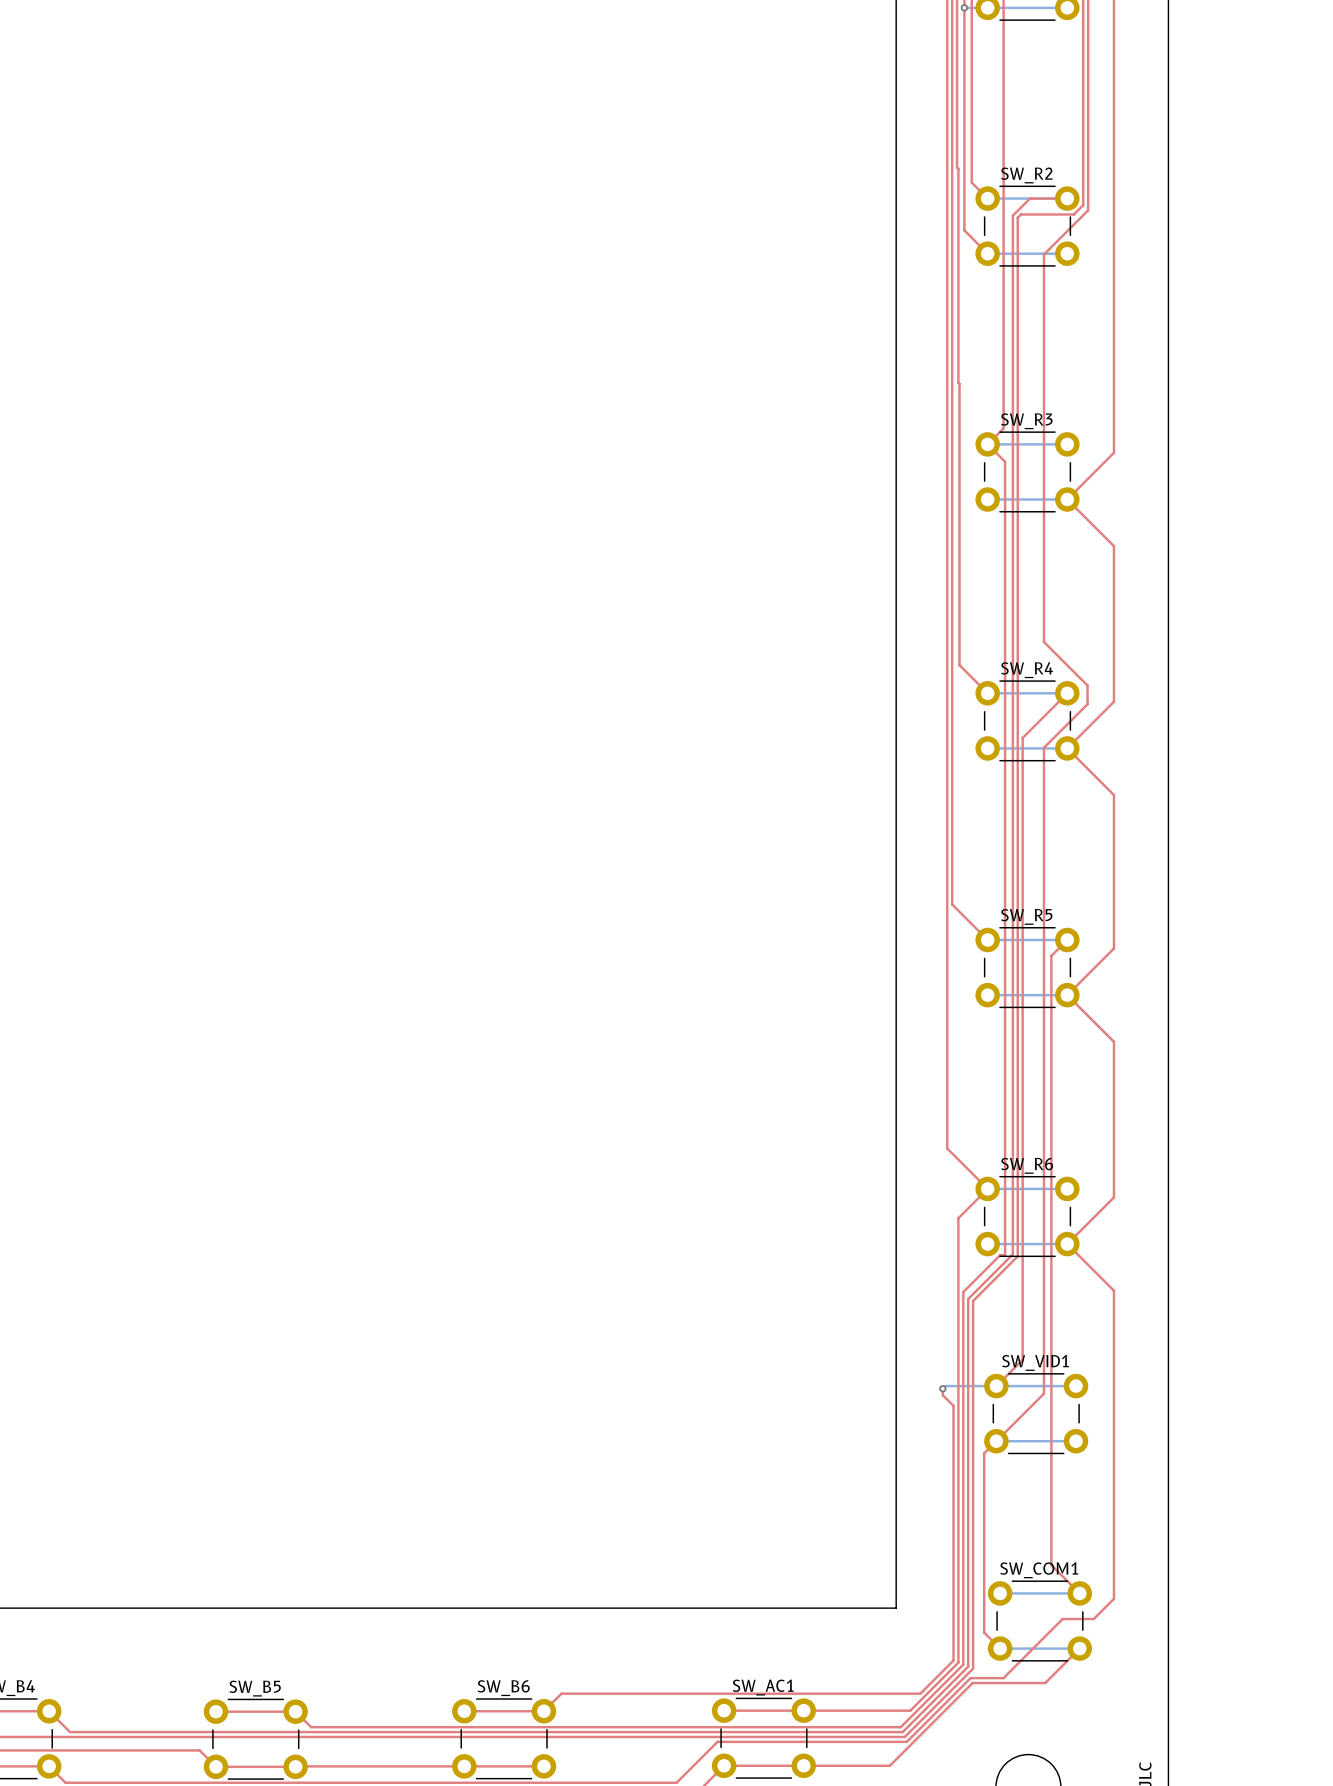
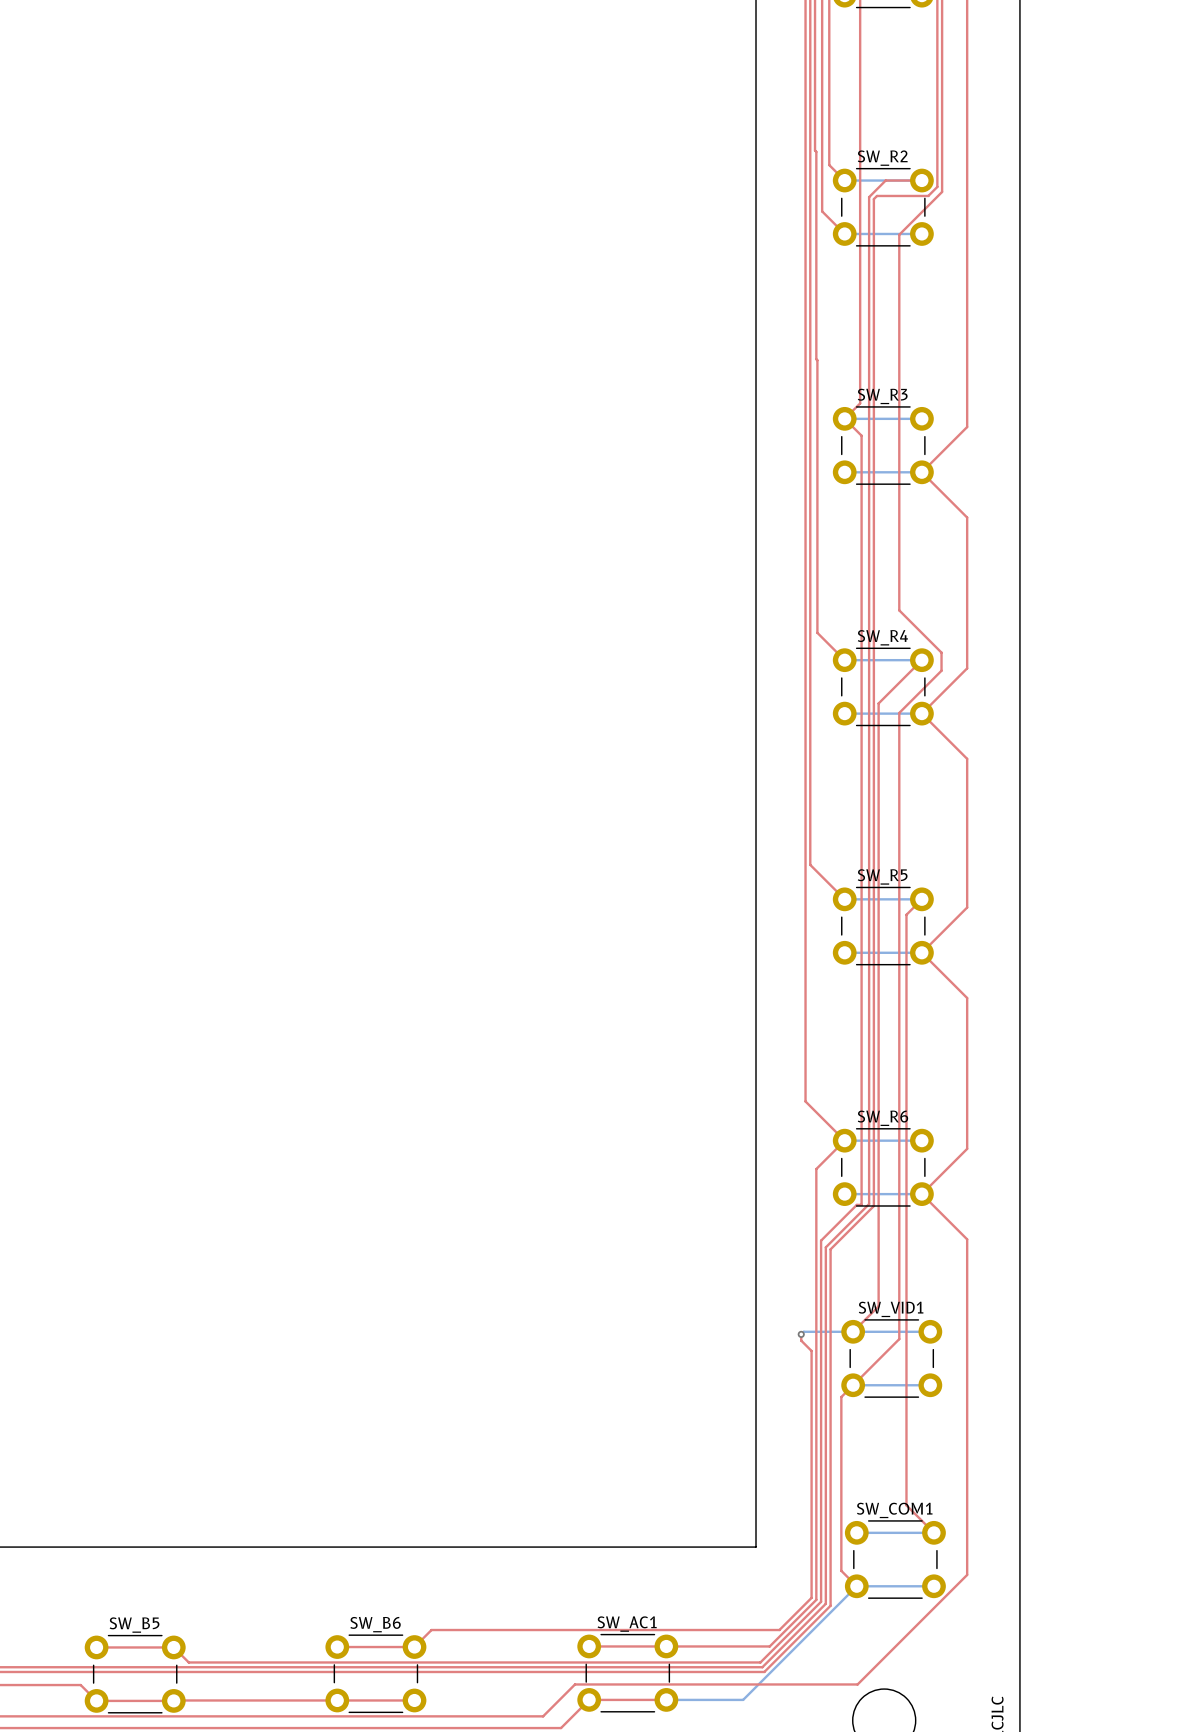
top track: (1113, 1598) (1093, 1619) (1062, 1619) (1003, 1678) (970, 1678) (906, 1741) (717, 1741) (709, 1749) -> (967, 1538) (967, 1574) (857, 1684) (575, 1684)
bottom track: none -> (856, 1586) (743, 1699) (666, 1699)
top track: (1079, 1648) (1045, 1683) (972, 1683) (889, 1765) (803, 1765) -> none

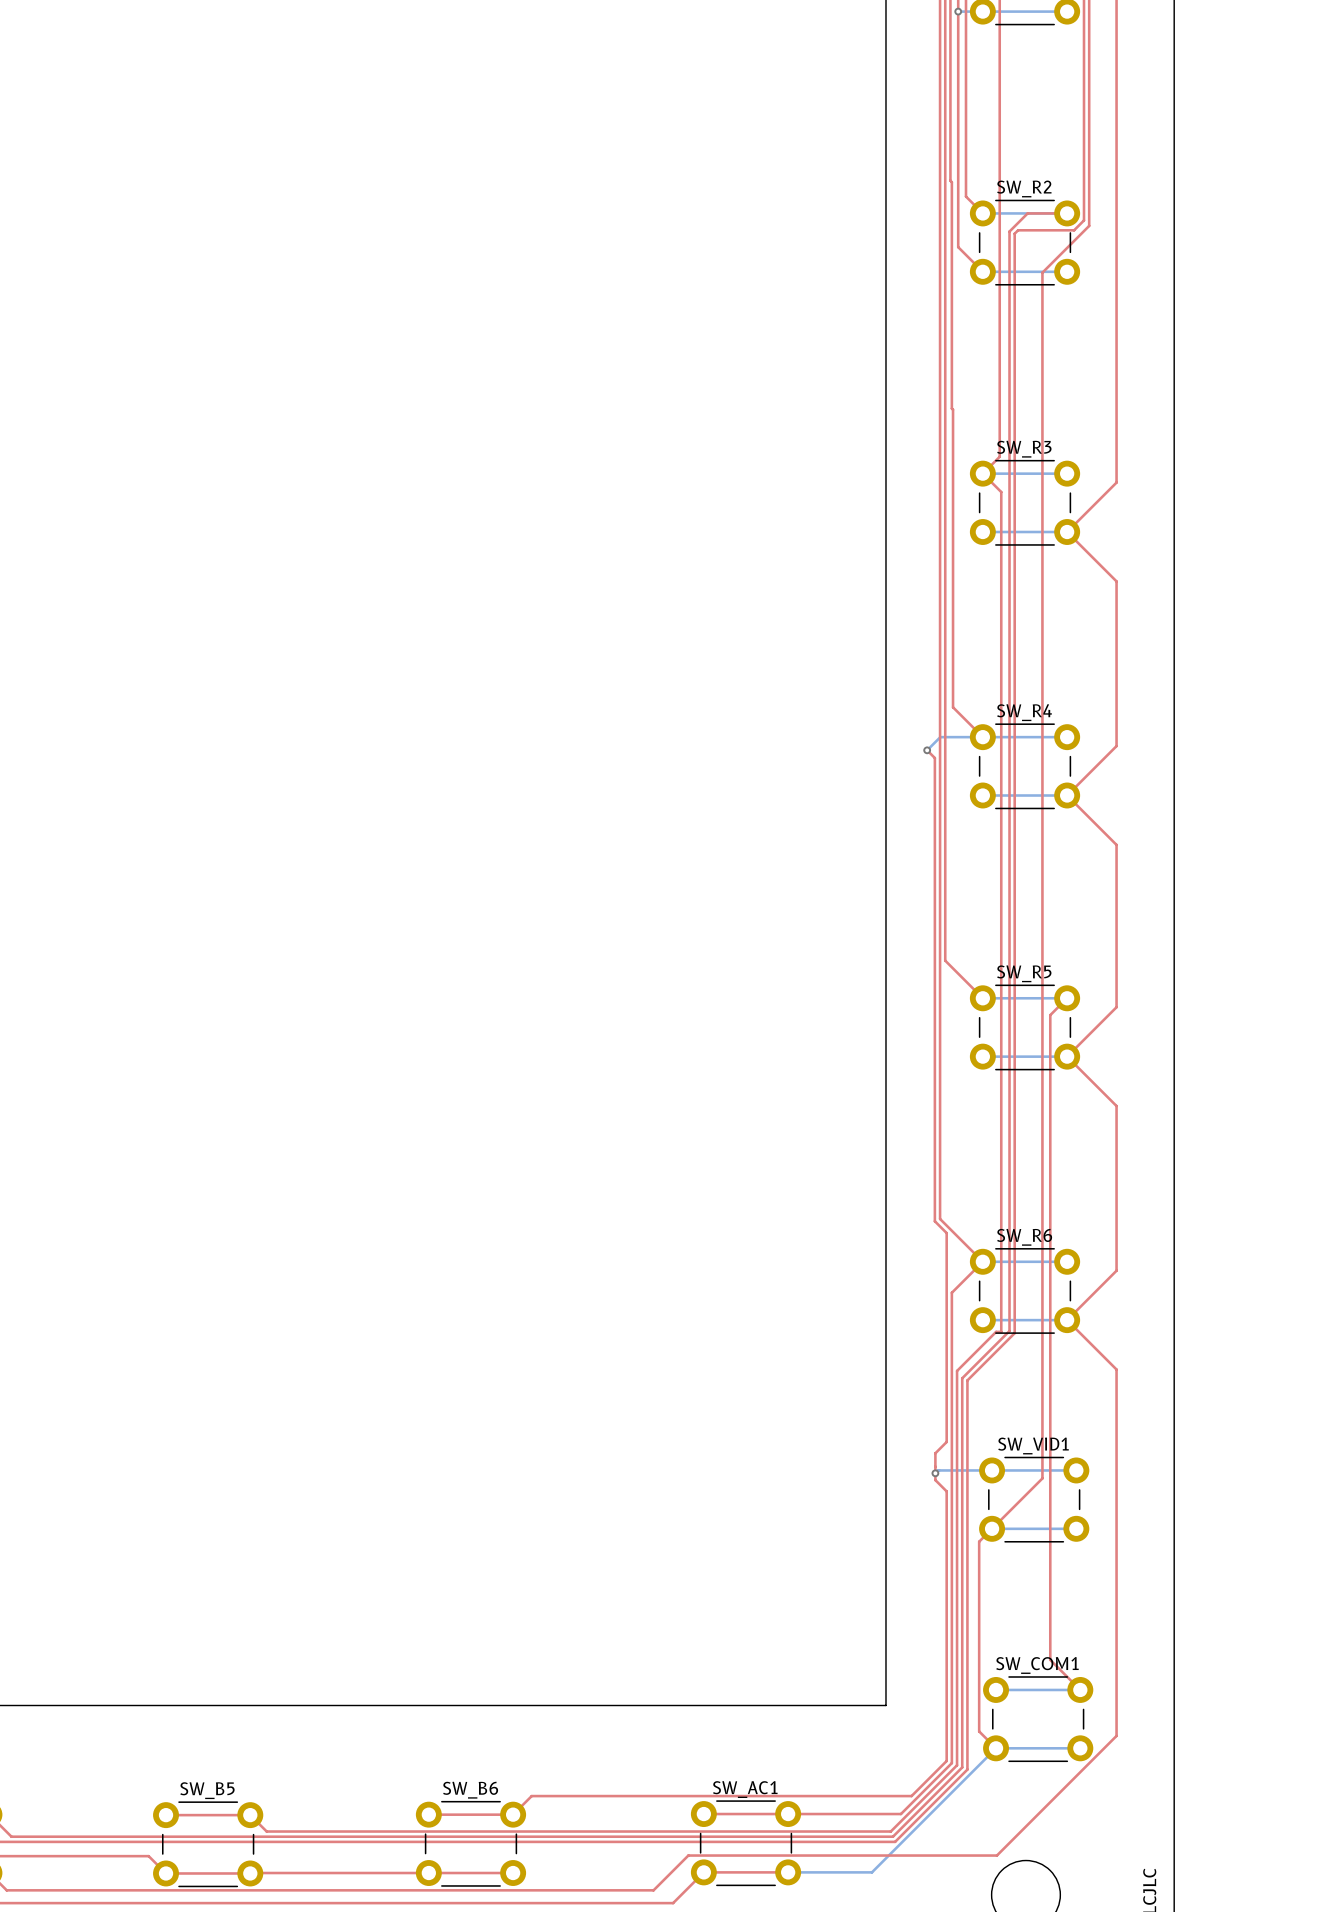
top track: (899, 610) (941, 652) (941, 670) (899, 712) -> (1042, 682) (1042, 794)
bottom track: none -> (982, 737) (940, 737) (927, 750)
top track: (921, 660) (878, 703) (878, 1306) (853, 1331) -> none
top track: none -> (927, 750) (934, 758) (934, 1221) (946, 1233) (946, 1442) (935, 1453) (935, 1473)
via: none -> (927, 750)

